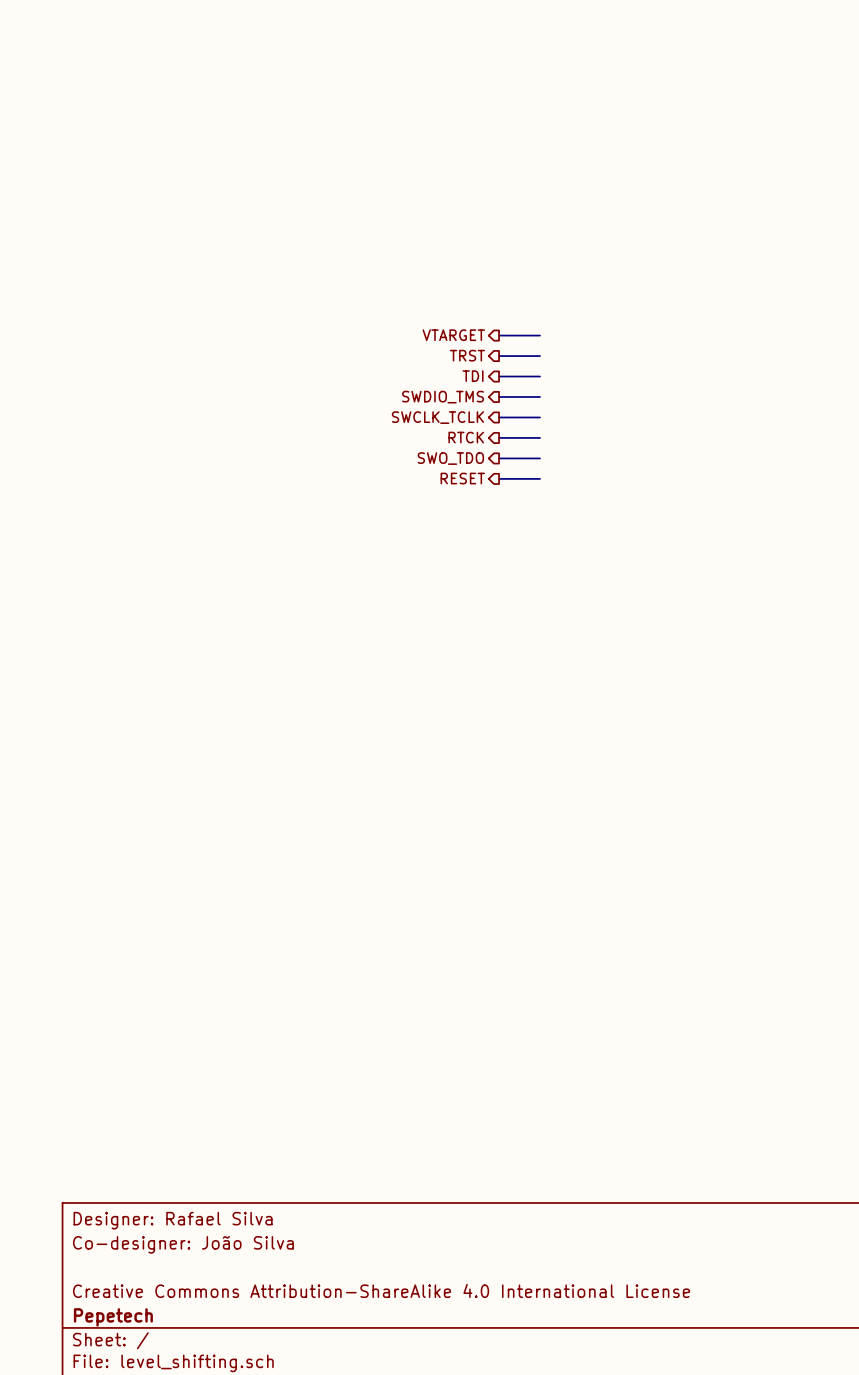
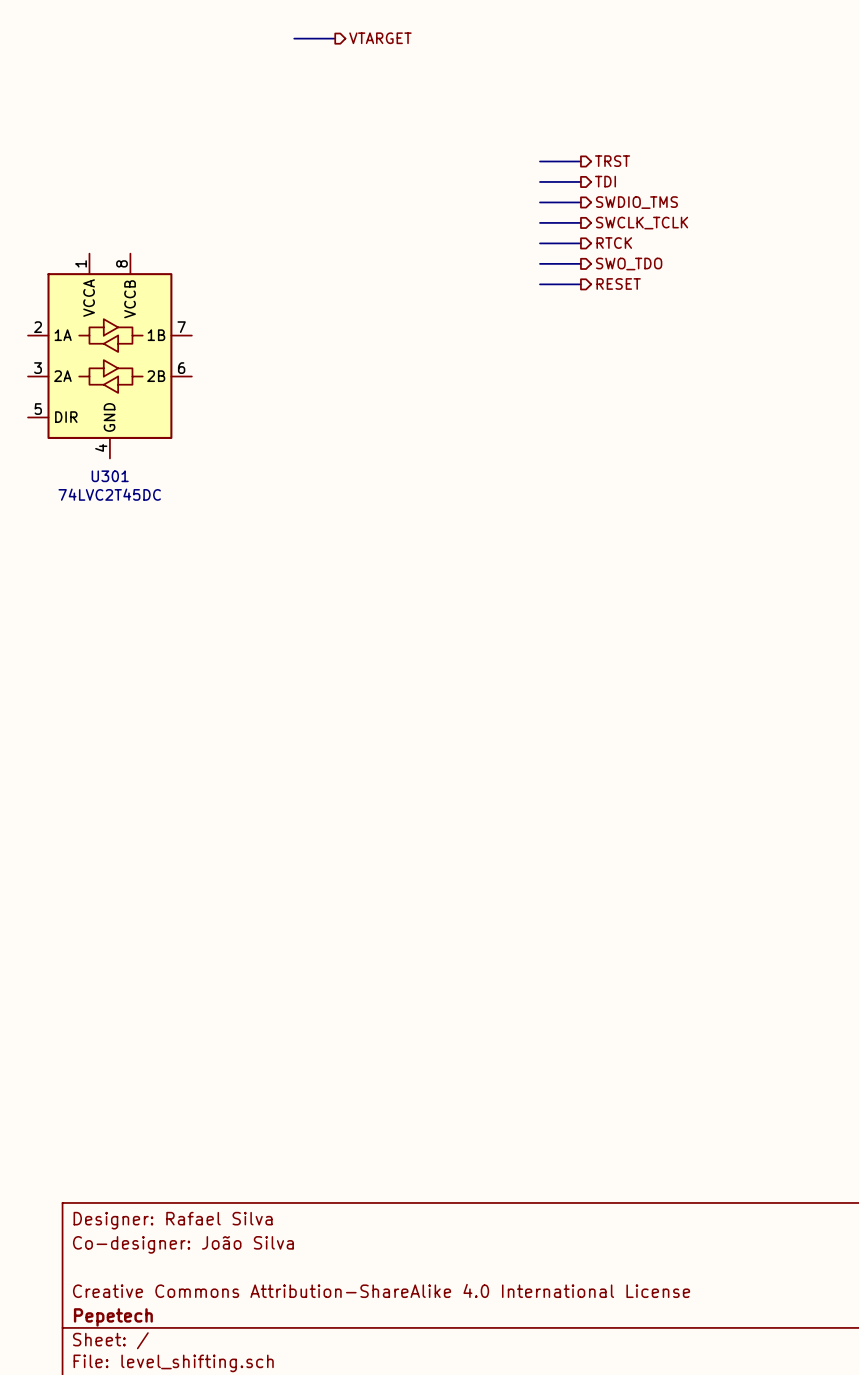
wire: none -> (294, 38) (335, 38)
hierarchical label: none -> VTARGET (380, 38)
hierarchical label: none -> TRST (612, 161)
hierarchical label: none -> TDI (605, 181)
hierarchical label: none -> SWDIO_TMS (636, 202)
hierarchical label: none -> SWCLK_TCLK (642, 223)
hierarchical label: none -> RTCK (614, 243)
hierarchical label: none -> SWO_TDO (629, 263)
hierarchical label: none -> RESET (618, 283)
hierarchical label: VTARGET (453, 335) -> none
wire: (499, 335) (539, 335) -> (539, 161) (580, 161)
hierarchical label: TRST (467, 355) -> none
U301: none -> 74LVC2T45DC (109, 356)
wire: (499, 356) (539, 356) -> (539, 181) (580, 181)
hierarchical label: TDI (473, 376) -> none
wire: (499, 376) (539, 376) -> (539, 202) (580, 202)
hierarchical label: SWDIO_TMS (443, 397) -> none
wire: (499, 397) (539, 397) -> (539, 222) (580, 222)
hierarchical label: SWCLK_TCLK (437, 417) -> none
wire: (499, 417) (539, 417) -> (539, 243) (580, 243)
hierarchical label: RTCK (466, 437) -> none
wire: (499, 437) (539, 437) -> (539, 263) (580, 263)
hierarchical label: SWO_TDO (450, 458) -> none
wire: (499, 458) (539, 458) -> (539, 284) (580, 284)
hierarchical label: RESET (462, 478) -> none
wire: (499, 478) (539, 478) -> none

